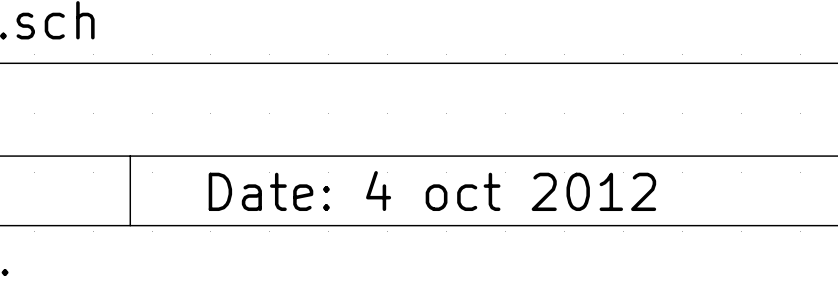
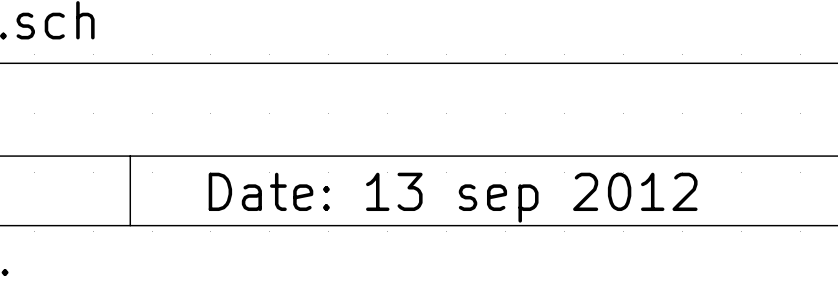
title block: Date: 4 oct 2012 (432, 191) -> Date: 13 sep 2012 (453, 197)

